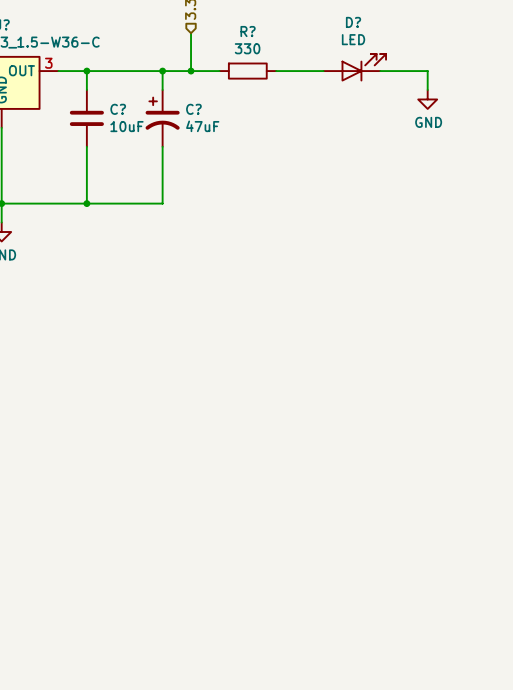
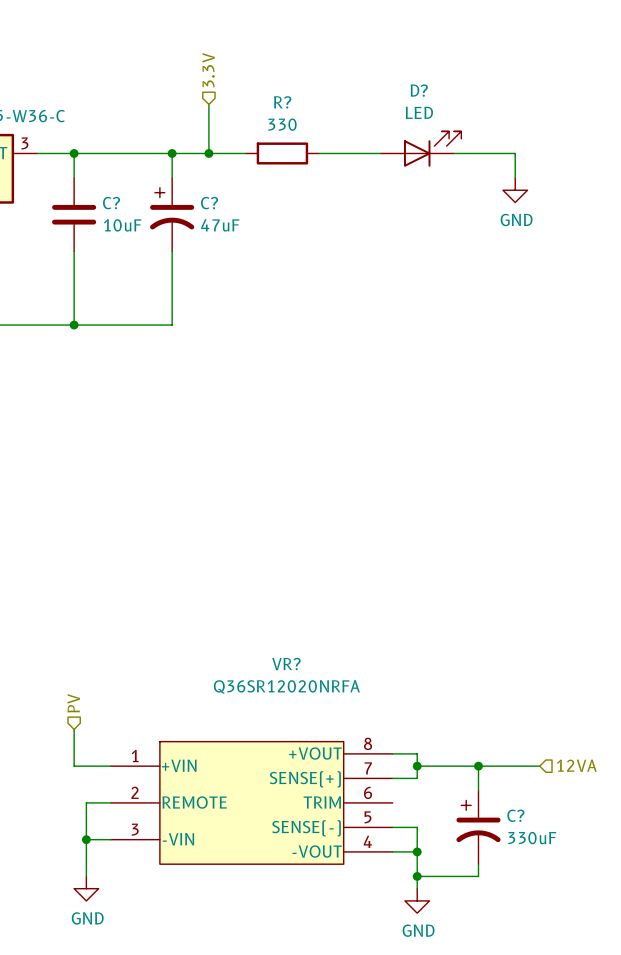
hierarchical label: none -> PV (73, 703)
wire: none -> (74, 729) (74, 766) (110, 766)
wire: none -> (392, 753) (417, 753) (417, 778) (392, 778)
wire: none -> (417, 766) (539, 766)
junction: none -> (417, 766)
wire: none -> (478, 766) (478, 790)
junction: none -> (478, 766)
hierarchical label: none -> 12VA (576, 765)
VR?: none -> Q36SR12020NRFA (288, 784)
wire: none -> (110, 802) (86, 802) (86, 876)
wire: none -> (392, 827) (417, 827) (417, 888)
C?: none -> 330uF (478, 827)
wire: none -> (86, 839) (110, 839)
junction: none -> (86, 839)
wire: none -> (392, 851) (417, 851)
junction: none -> (417, 851)
wire: none -> (478, 864) (478, 876) (417, 876)
junction: none -> (417, 876)
power symbol: none -> GND (86, 888)
power symbol: none -> GND (417, 900)

